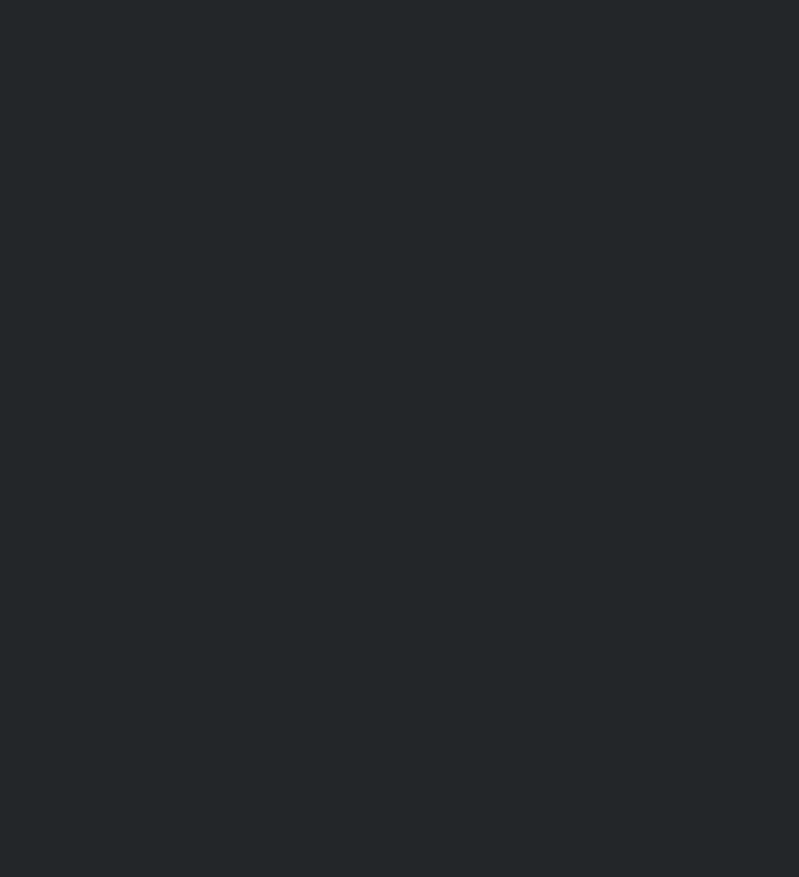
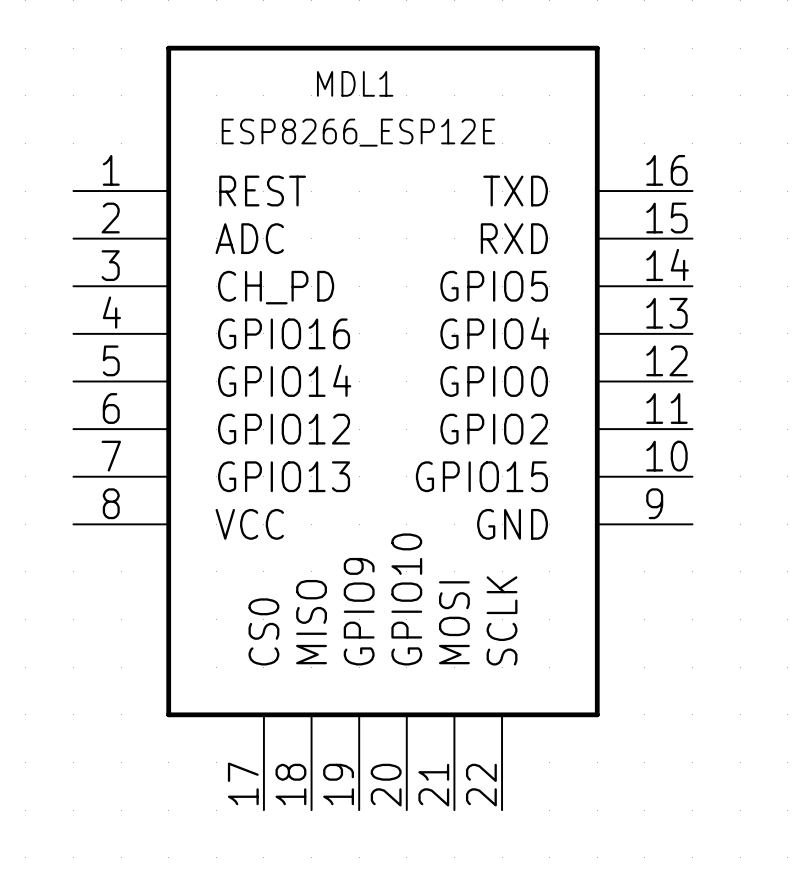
MDL1: none -> (382, 427)

